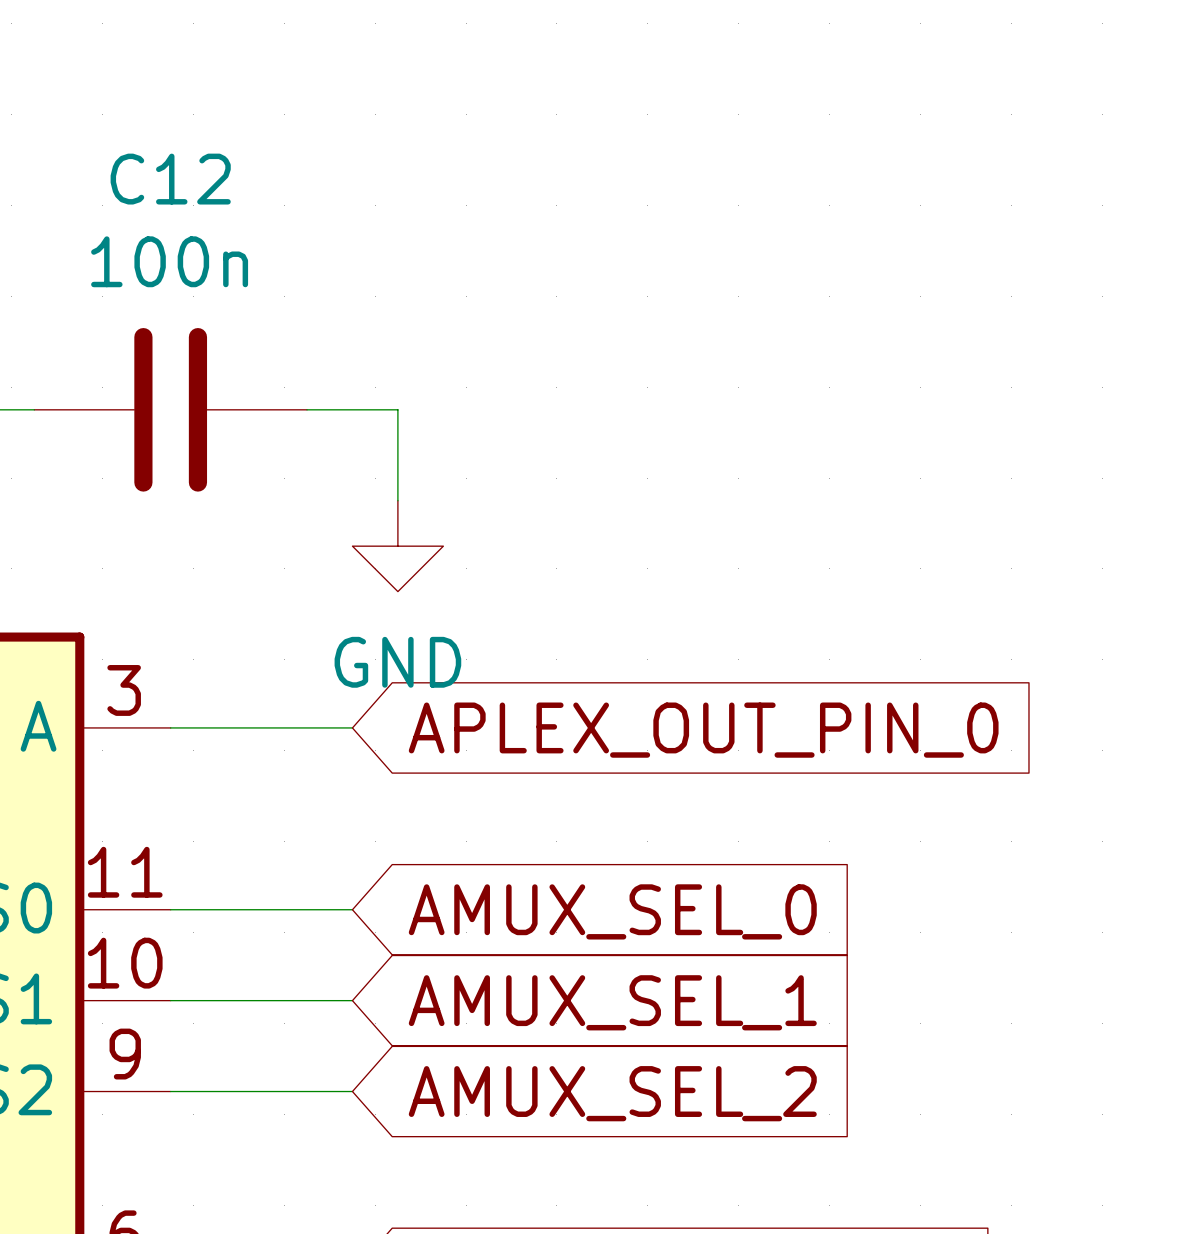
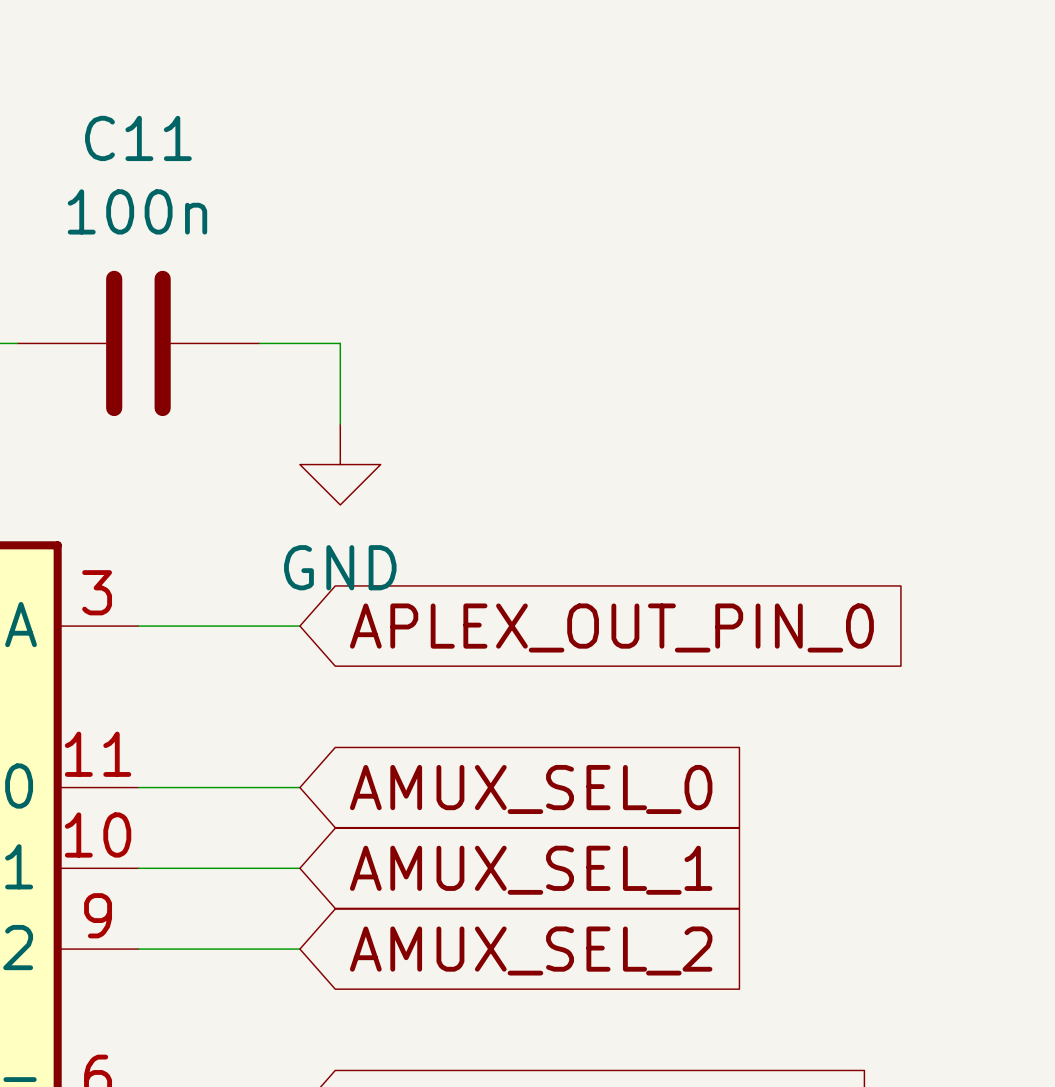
C12 name: C12 (170, 179) -> C11 (138, 138)

